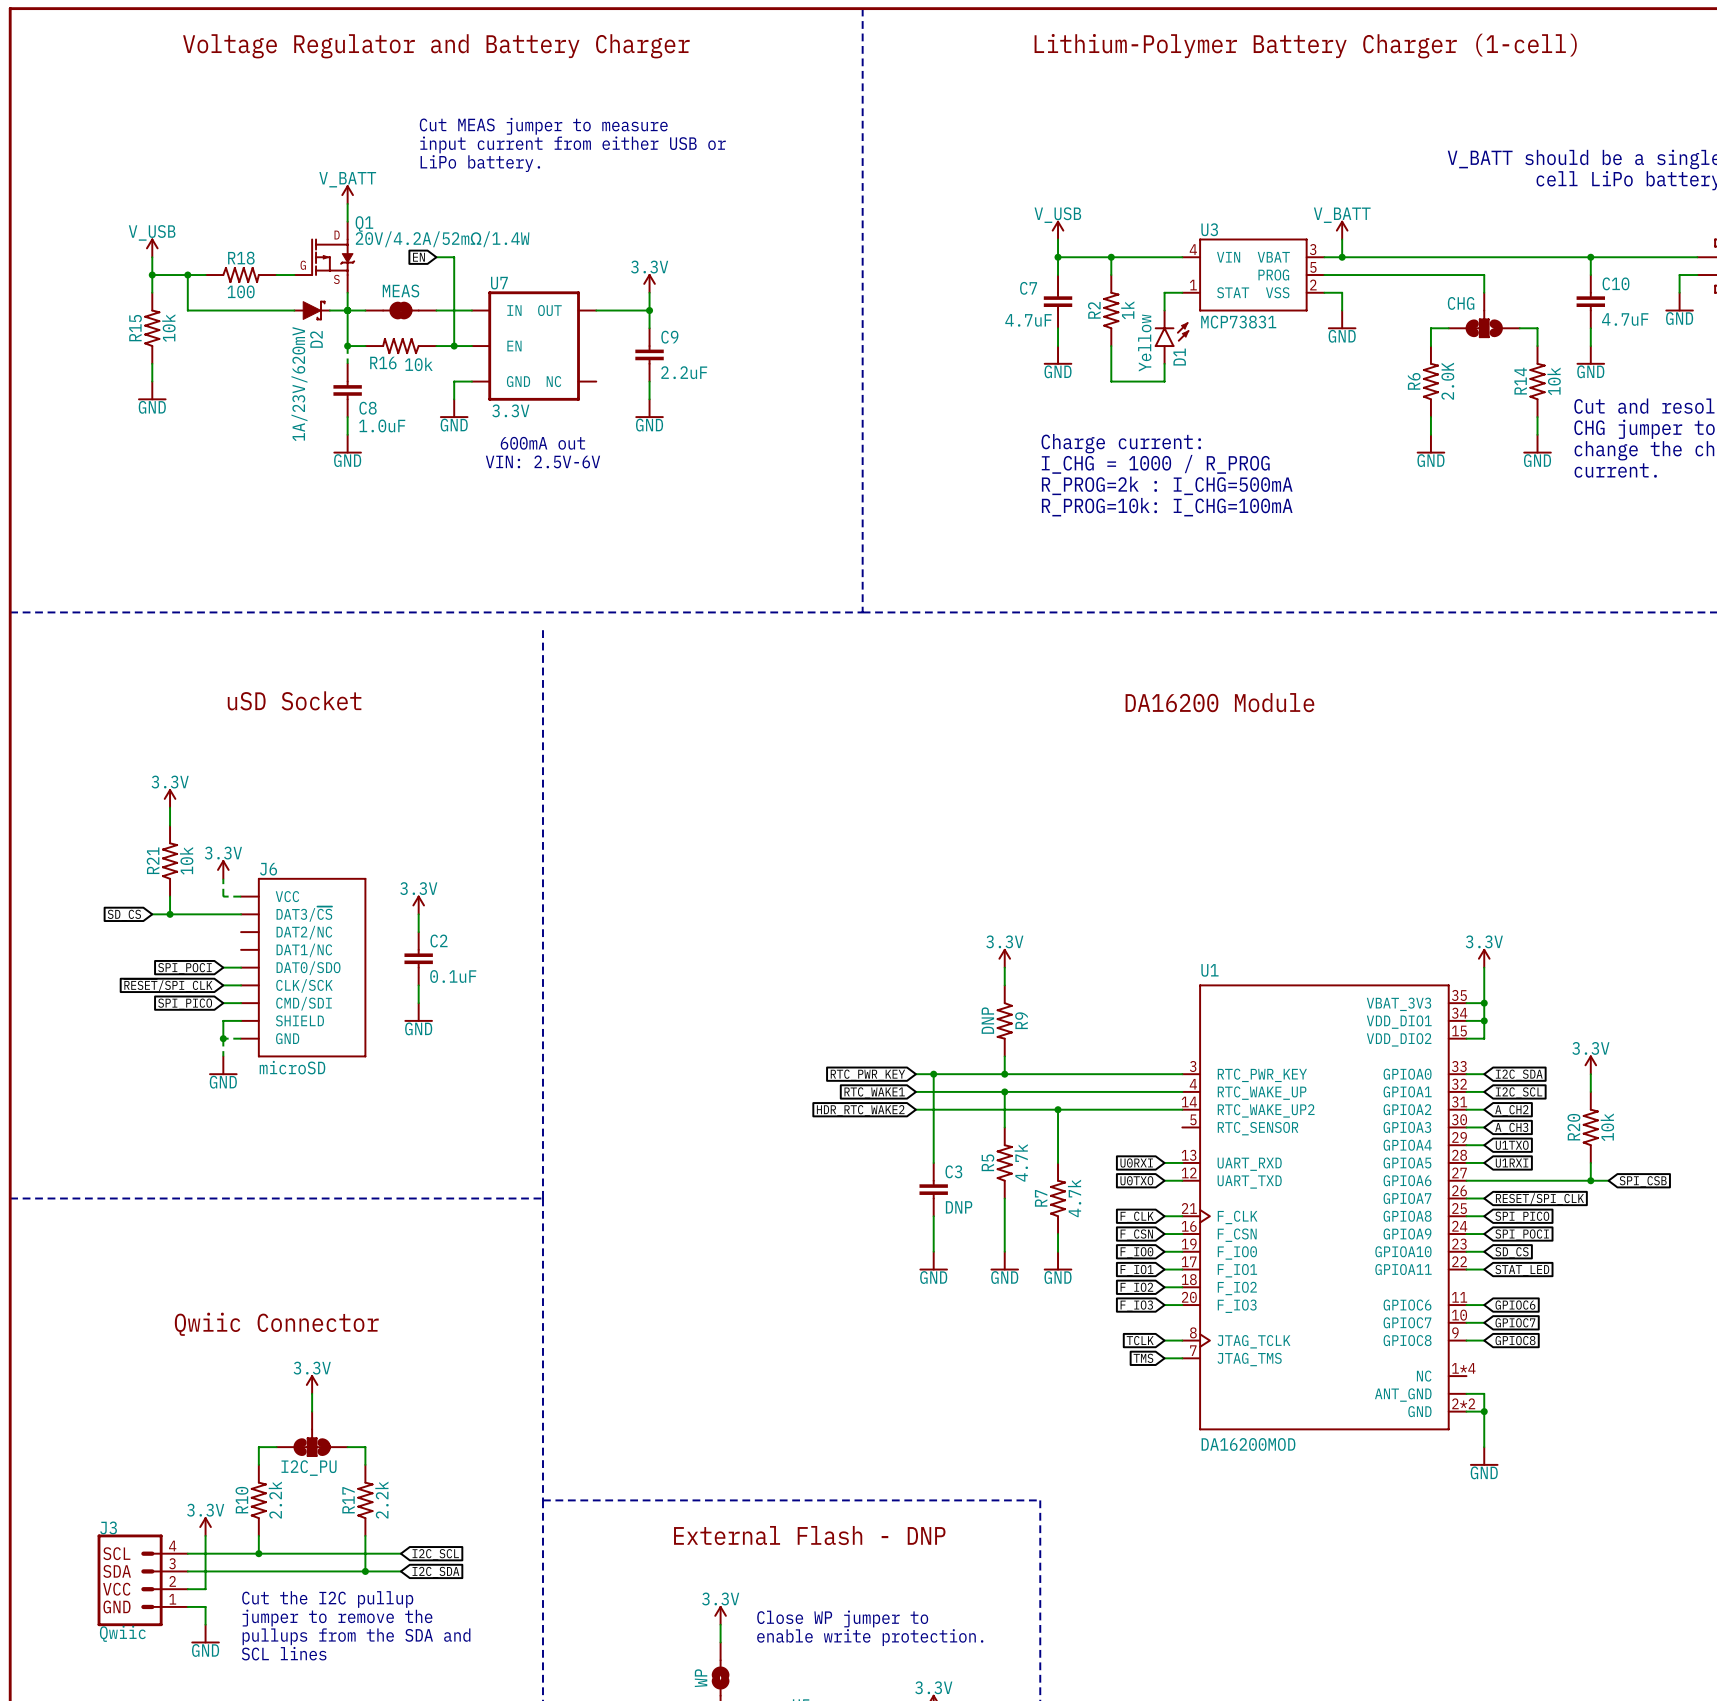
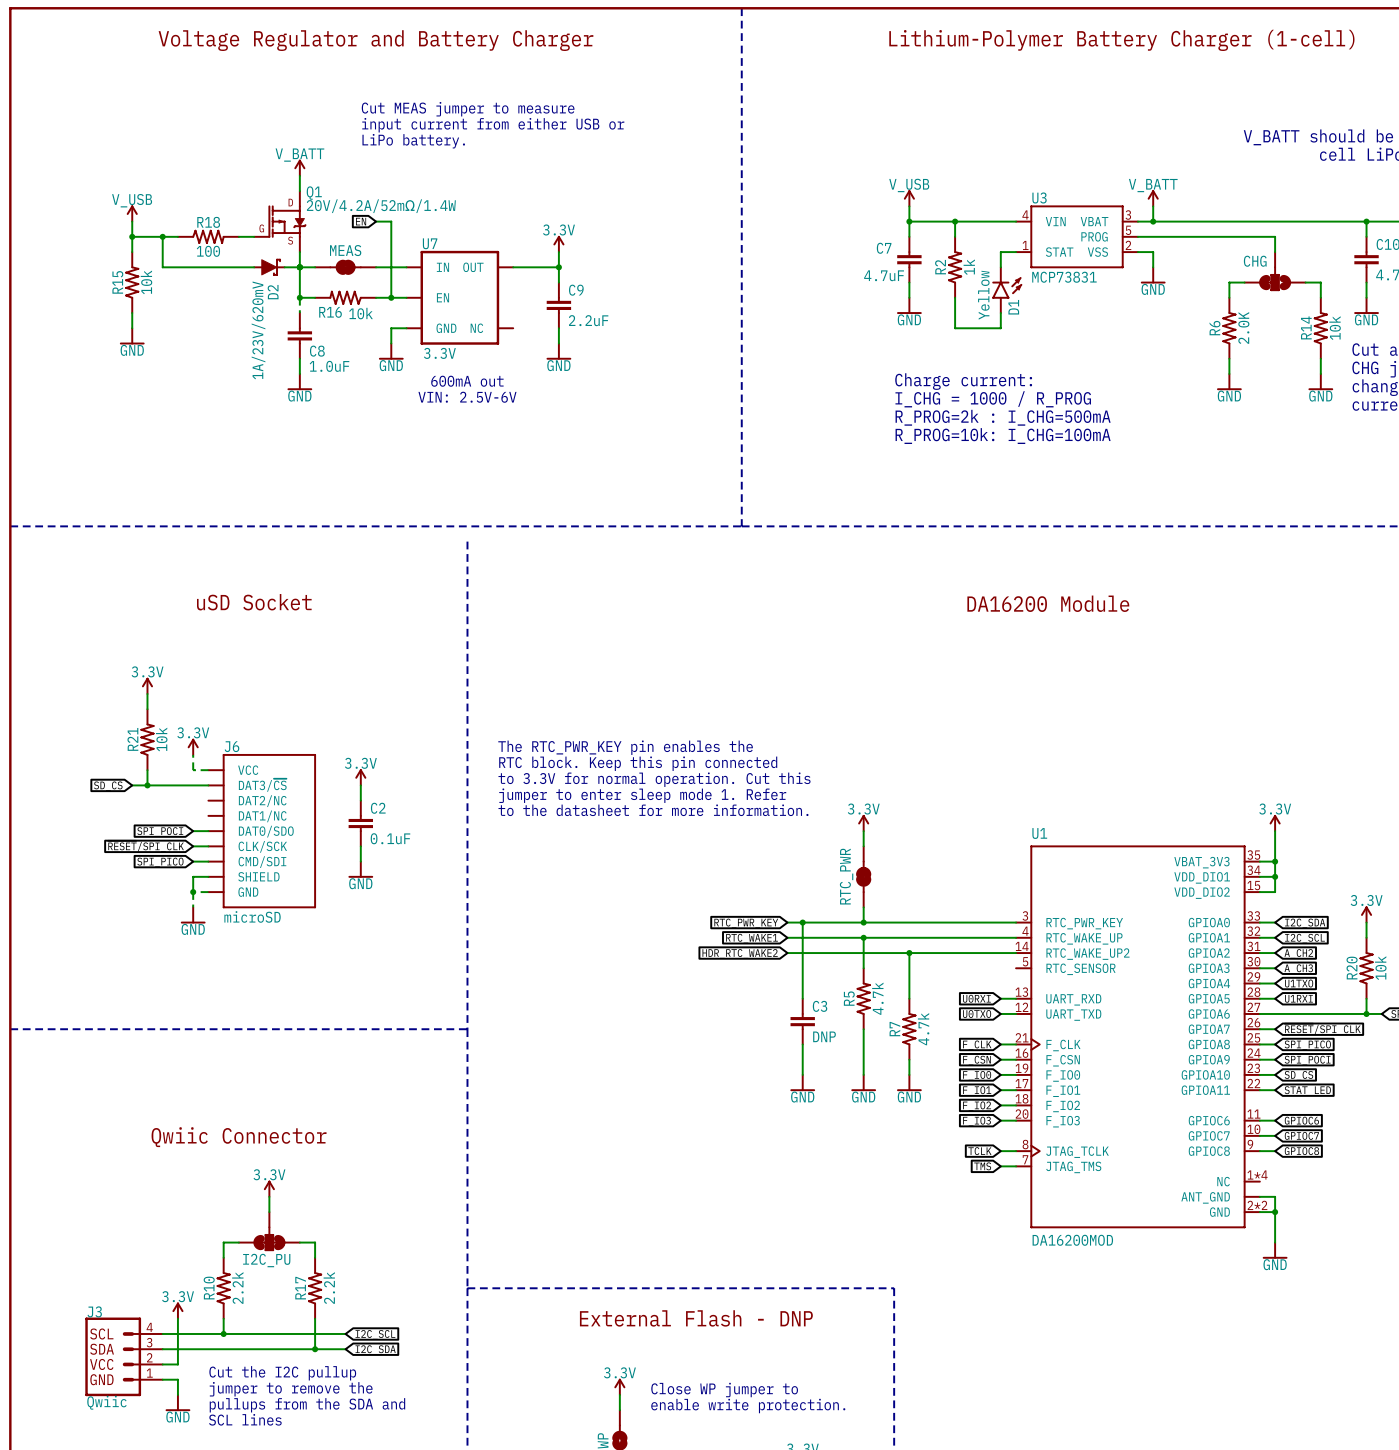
text: none -> The RTC_PWR_KEY pin enables the (625, 747)
text: none -> RTC block. Keep this pin connected (638, 763)
text: none -> to 3.3V for normal operation. Cut this (654, 779)
text: none -> jumper to enter sleep mode 1. Refer (642, 795)
text: none -> to the datasheet for more information. (653, 810)
R9: DNP (1004, 1020) -> none
RTC_PWR: none -> (863, 876)

